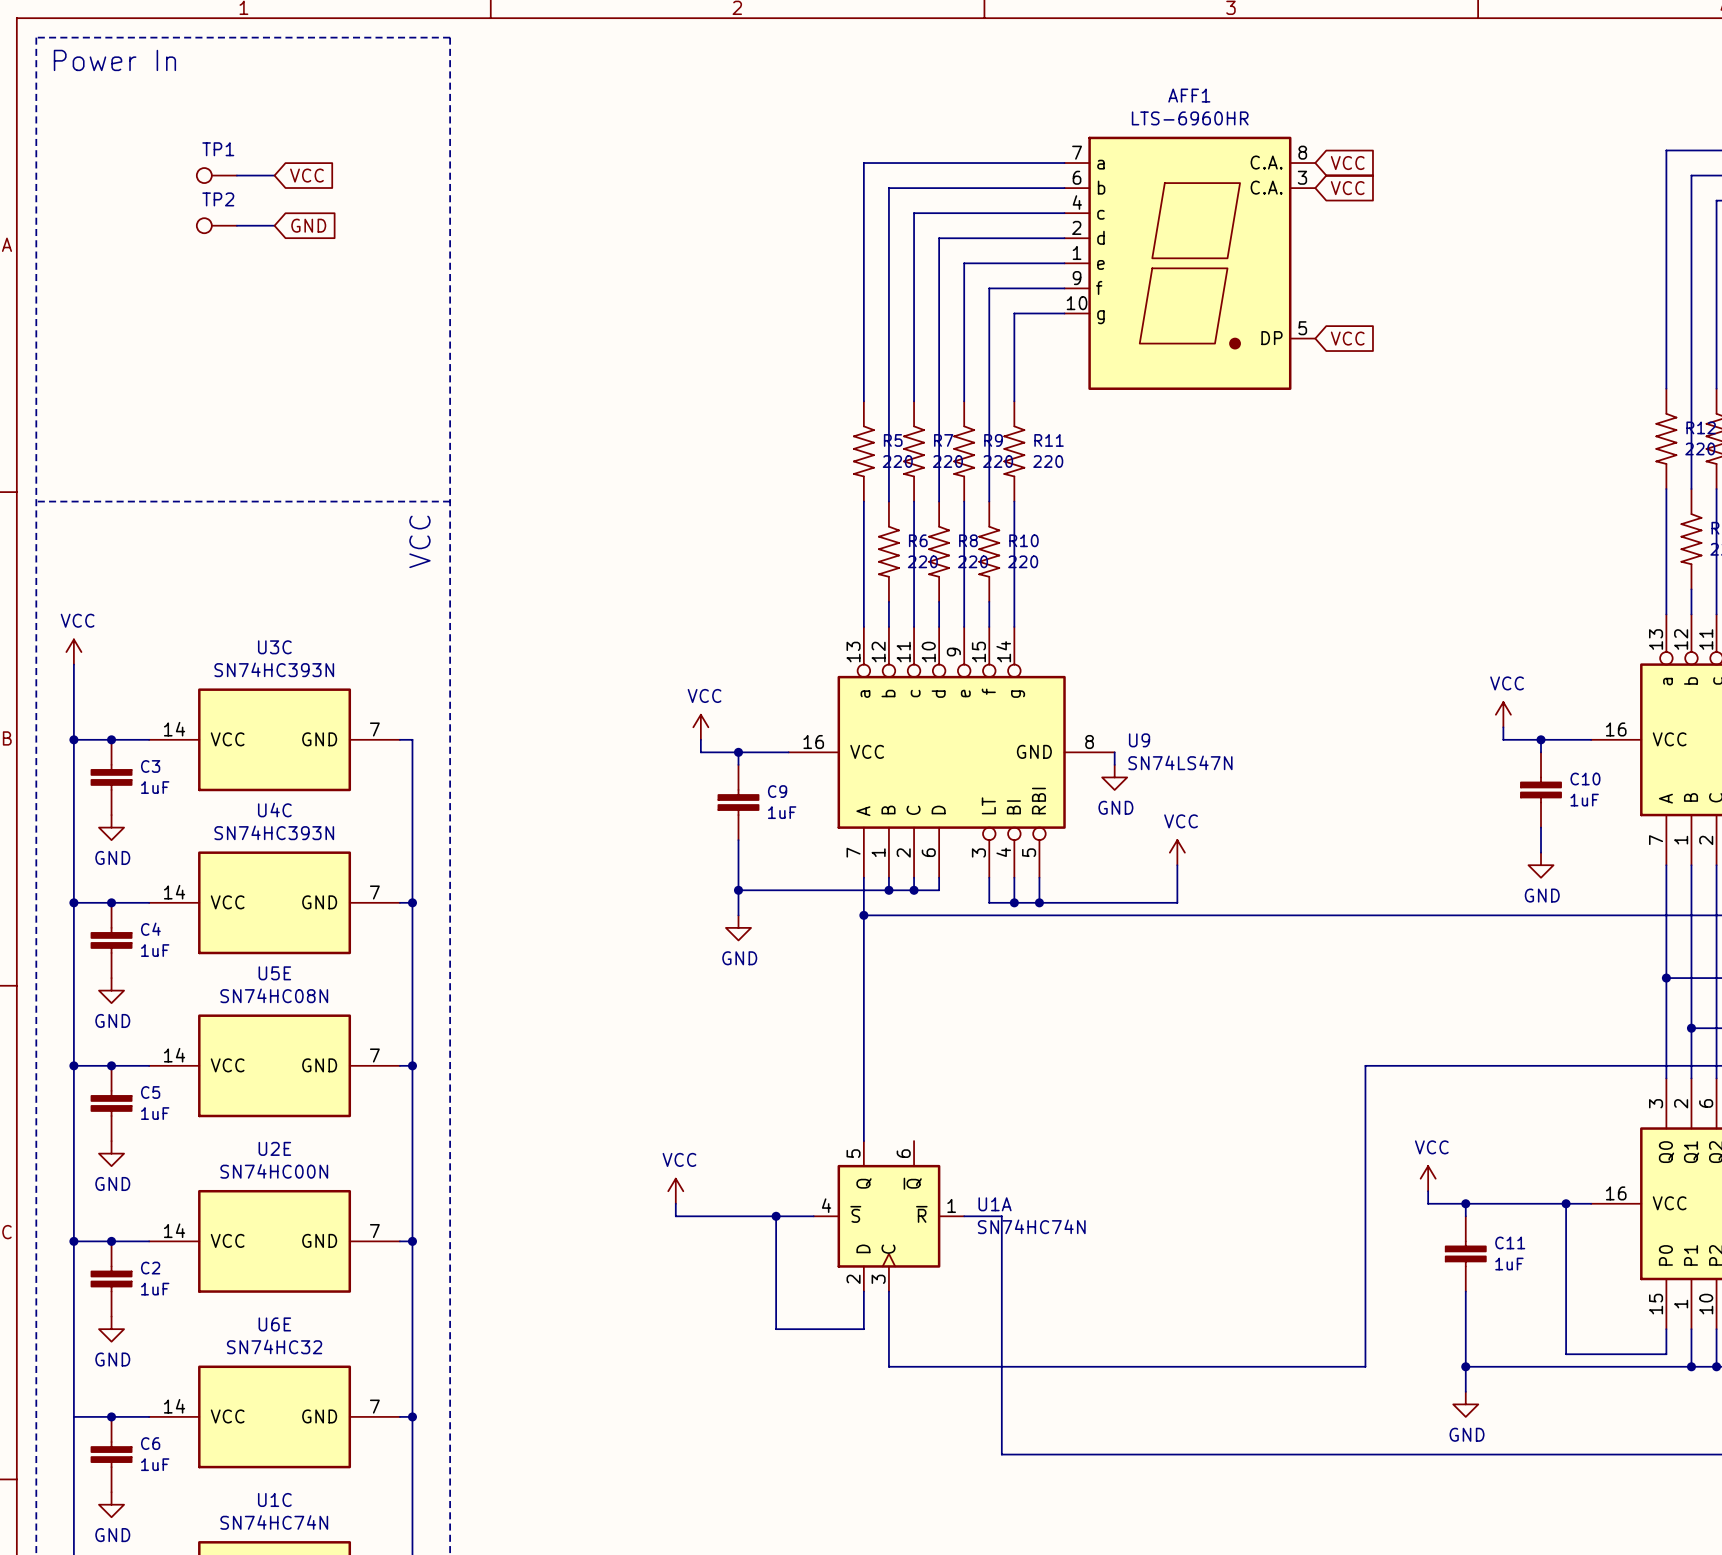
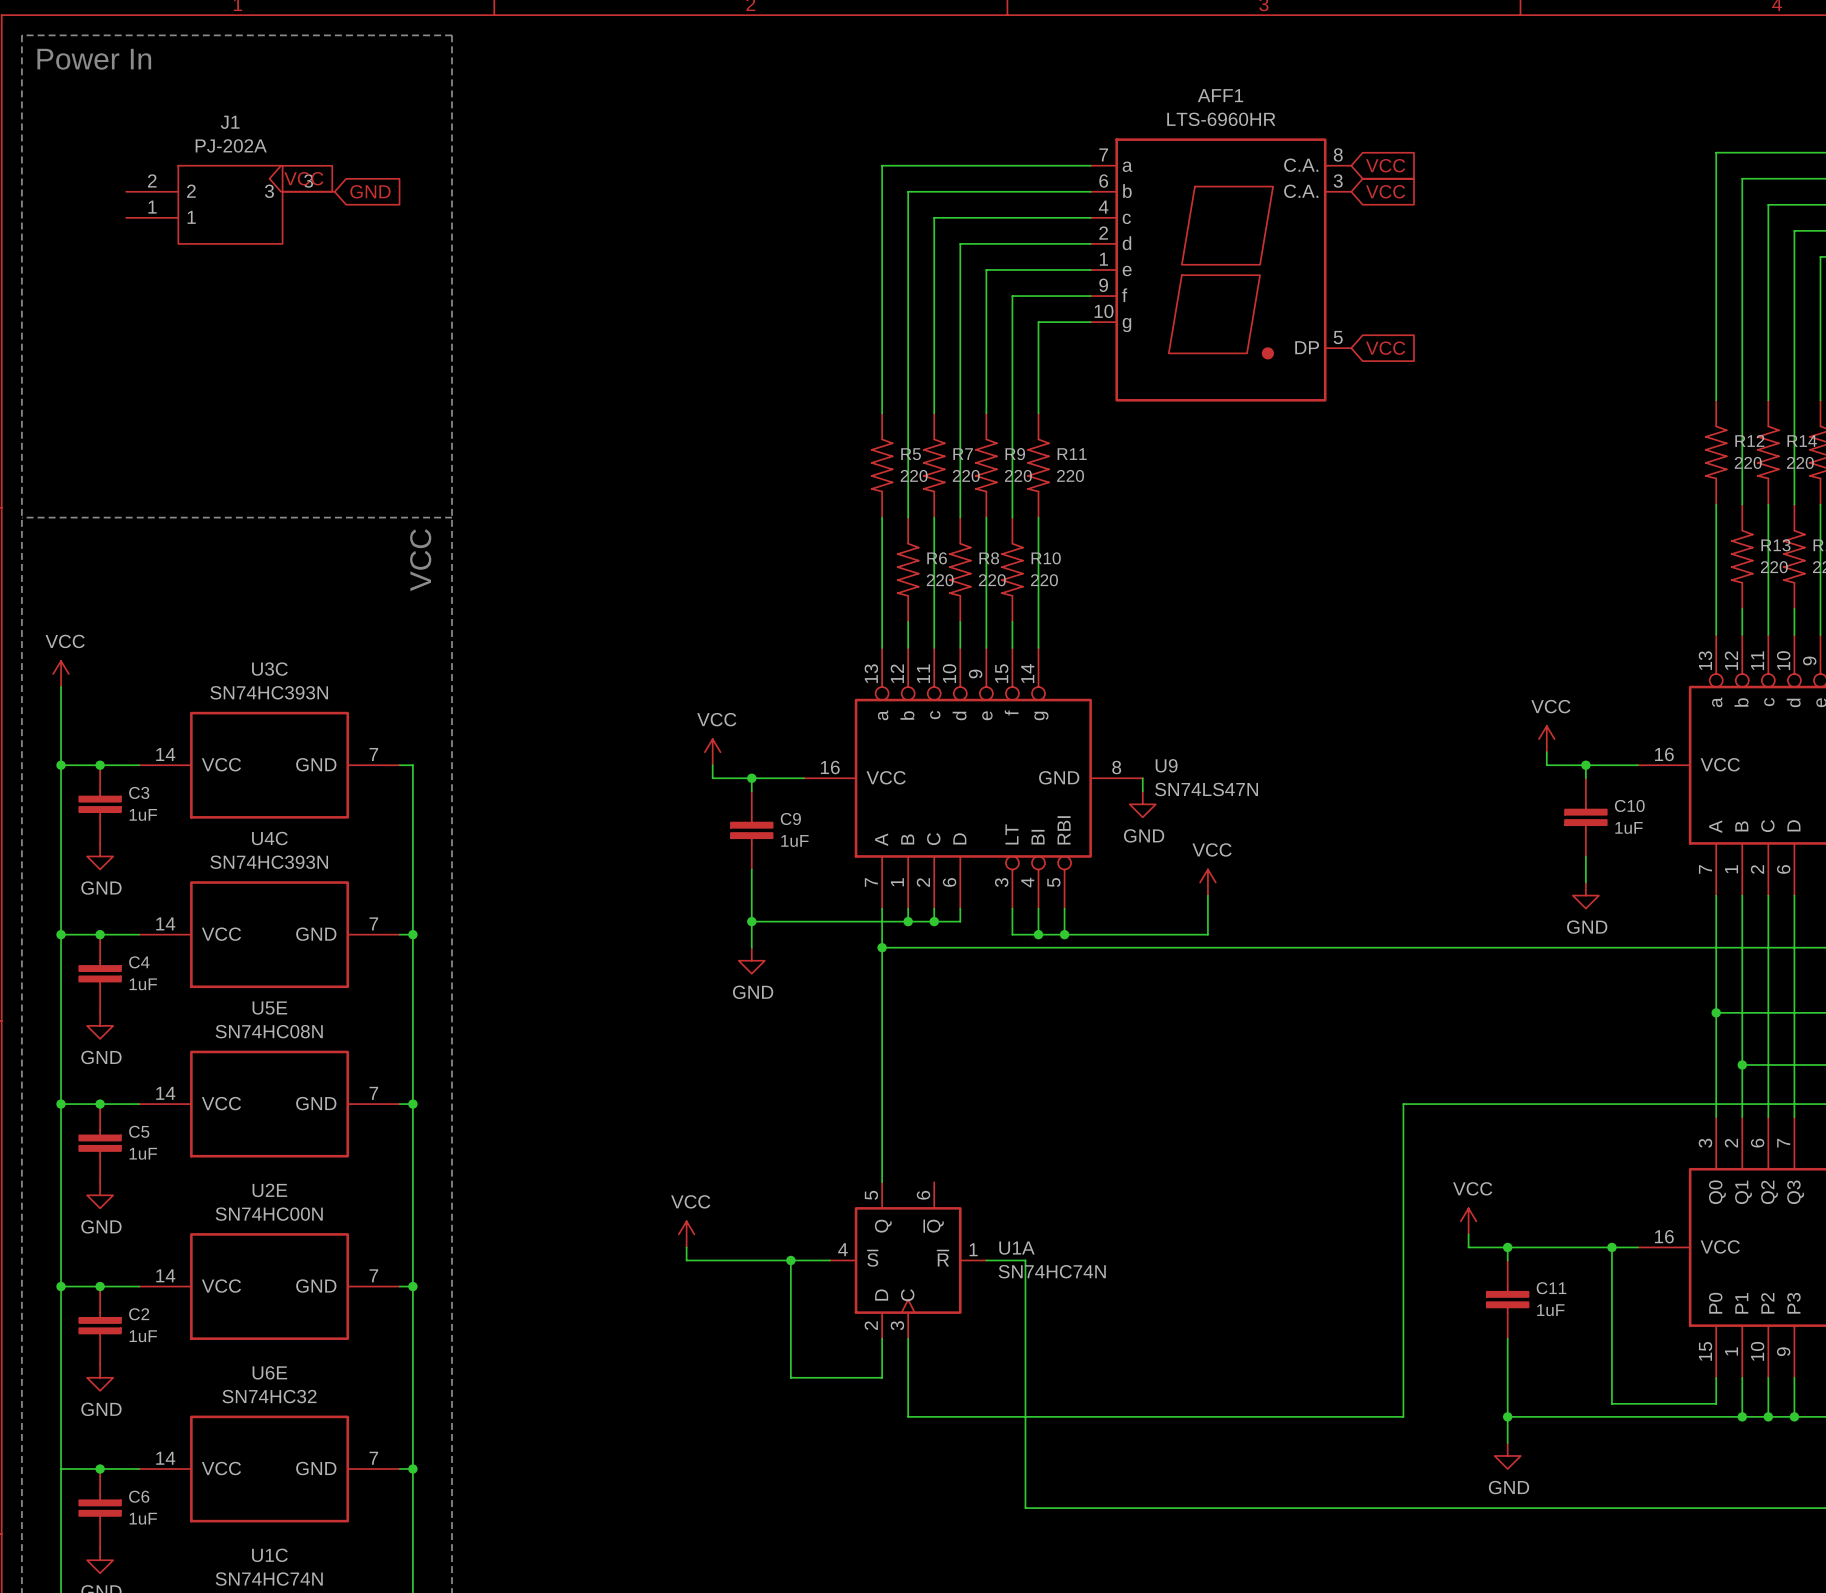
TP1: (216, 175) -> none
wire: (236, 175) (274, 175) -> none
J1: none -> PJ-202A (230, 204)
TP2: (216, 225) -> none
wire: (236, 225) (274, 225) -> none
global label position: GND (308, 225) -> GND (370, 191)

